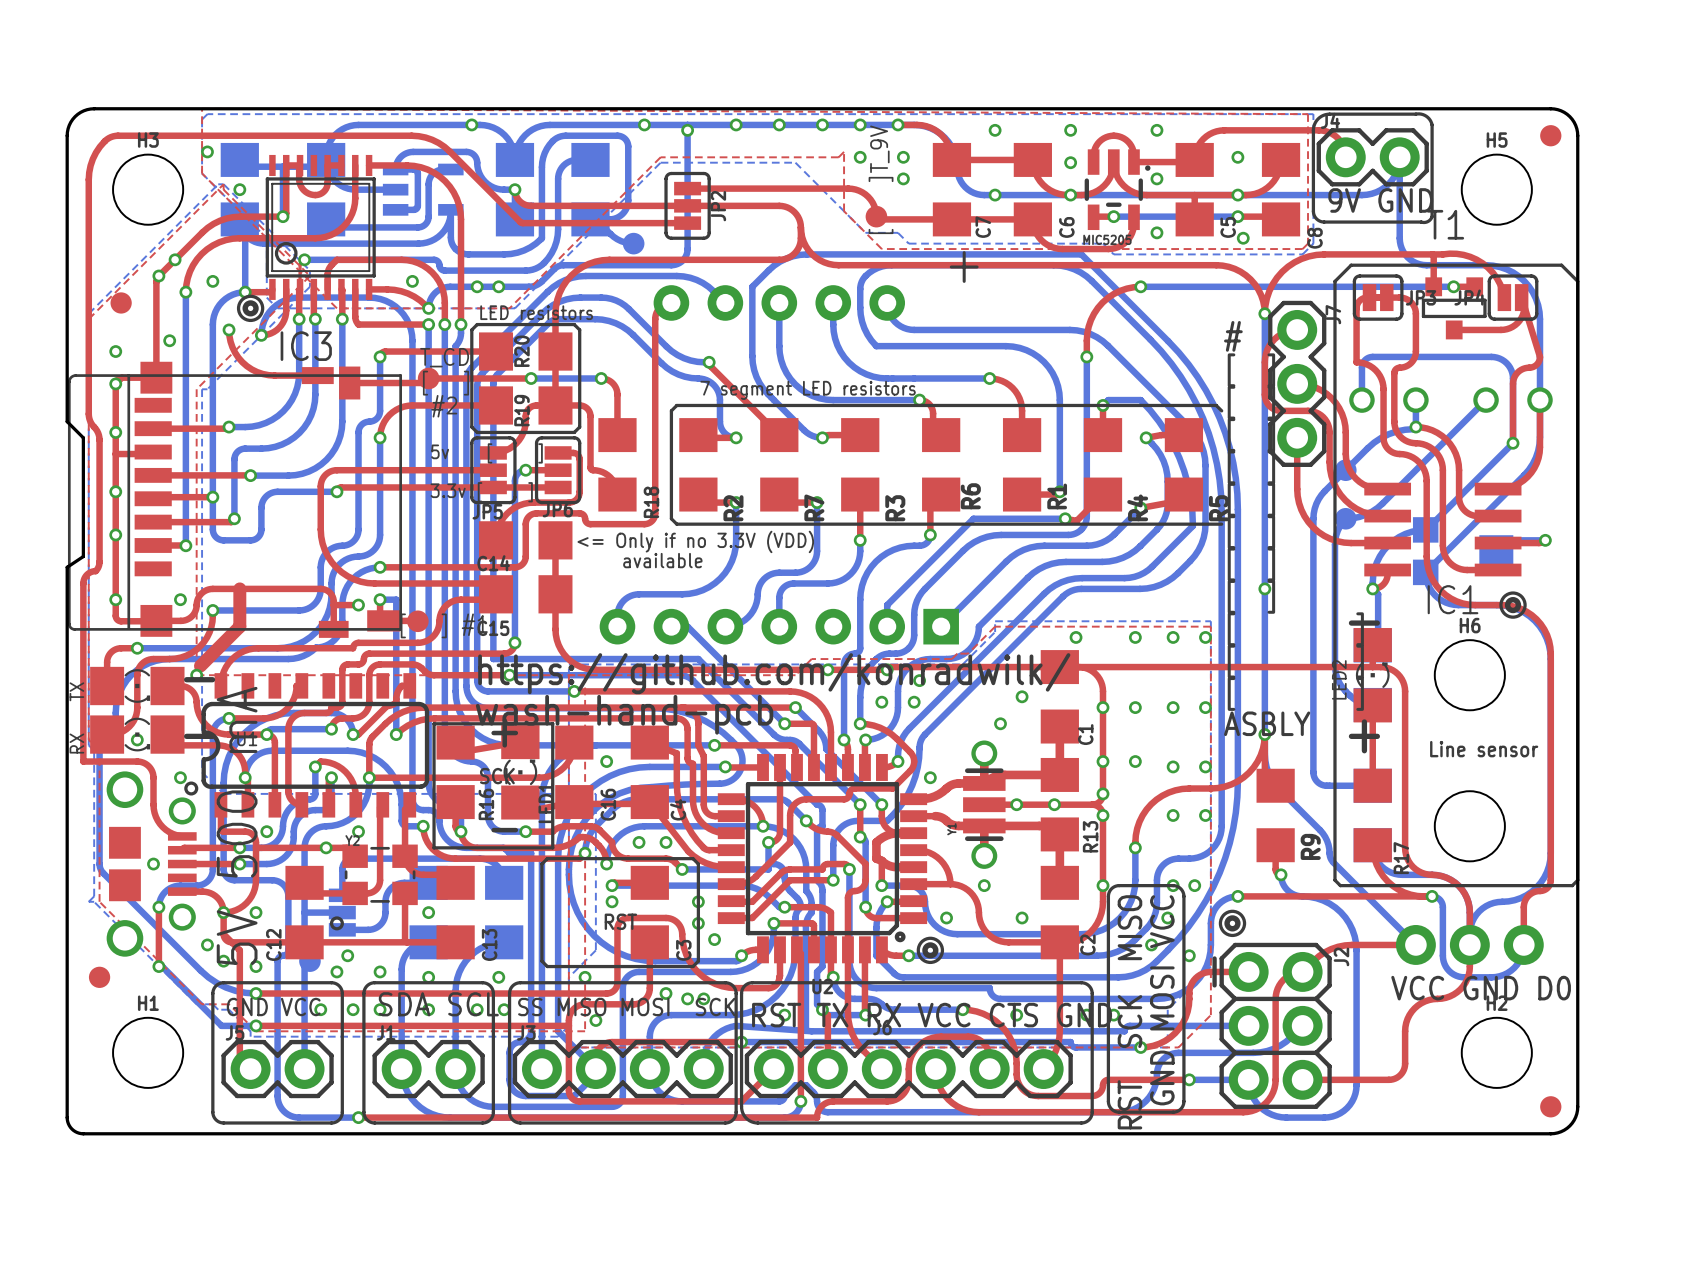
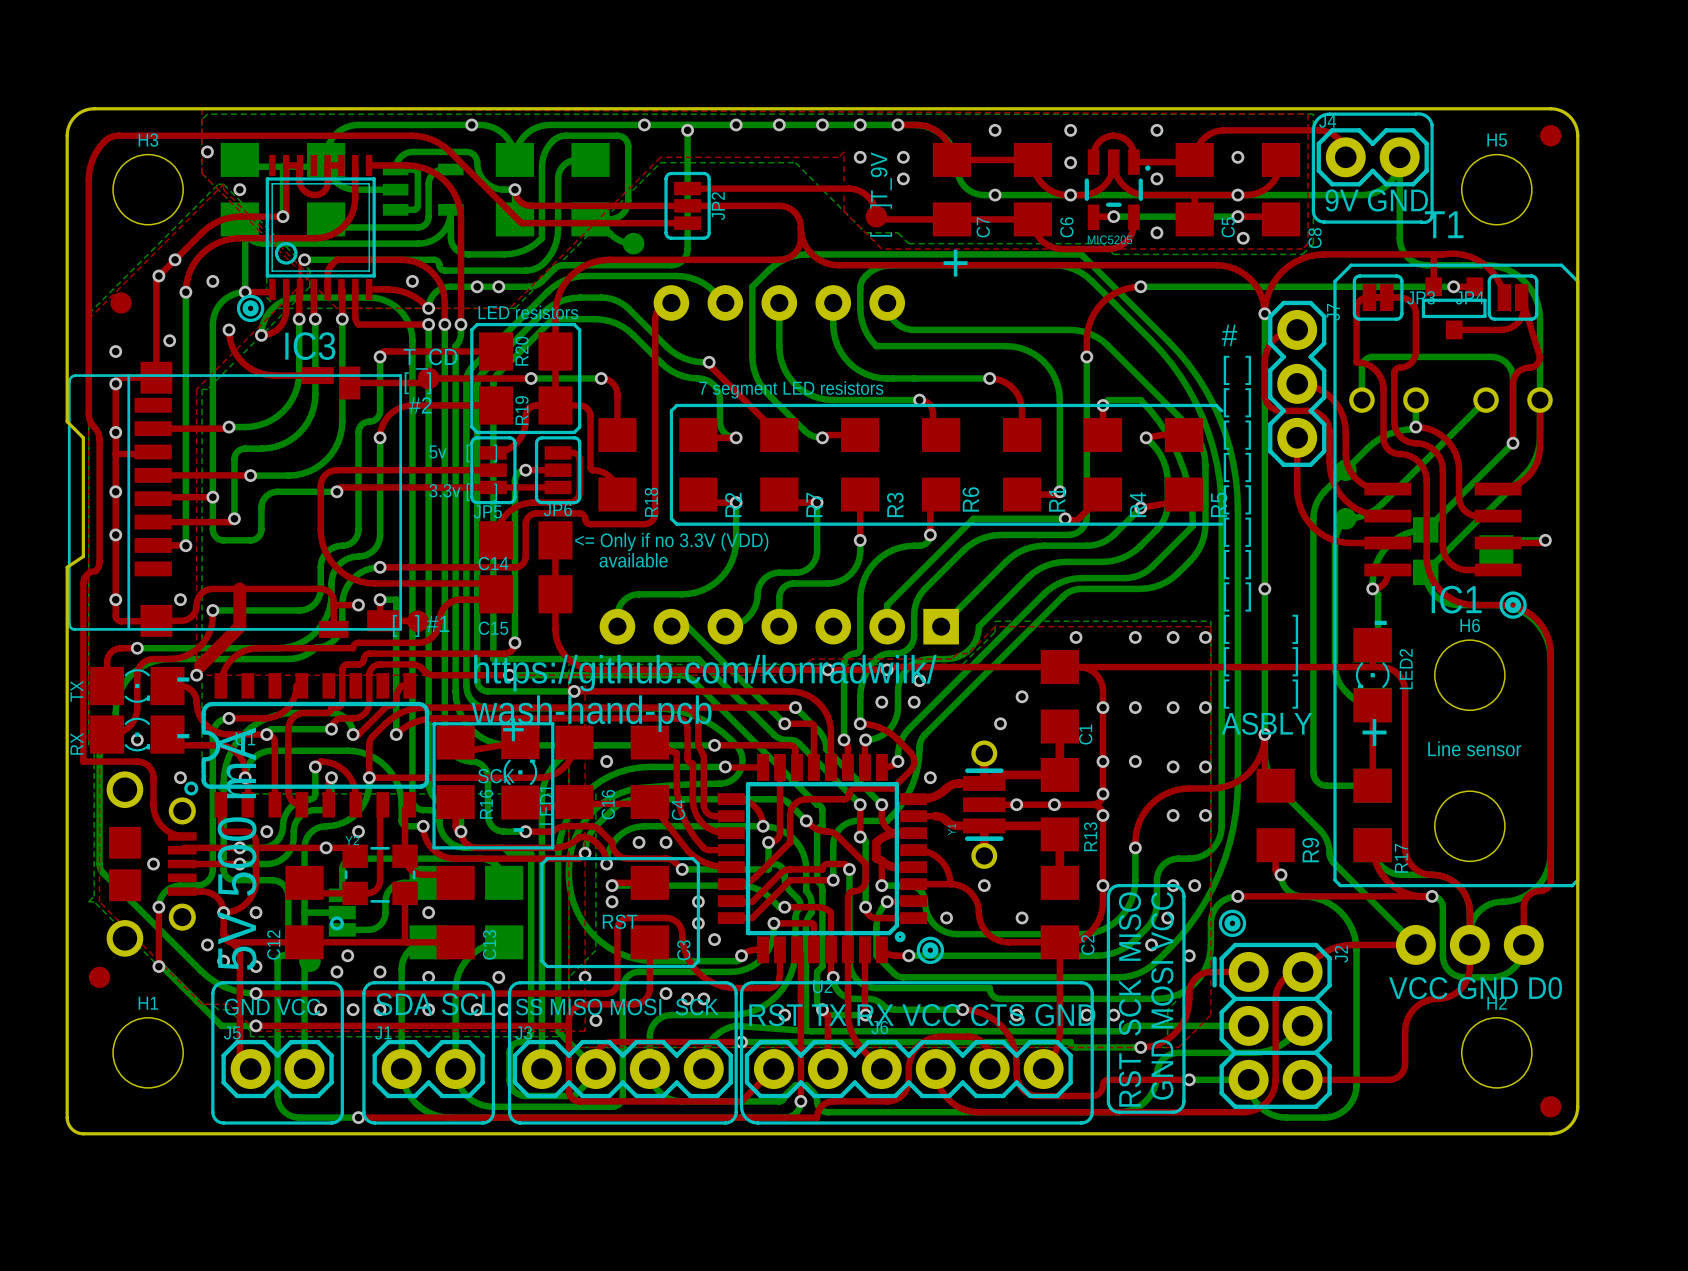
LED2 rotation: 0° (1372, 675) -> 180° (1372, 675)

